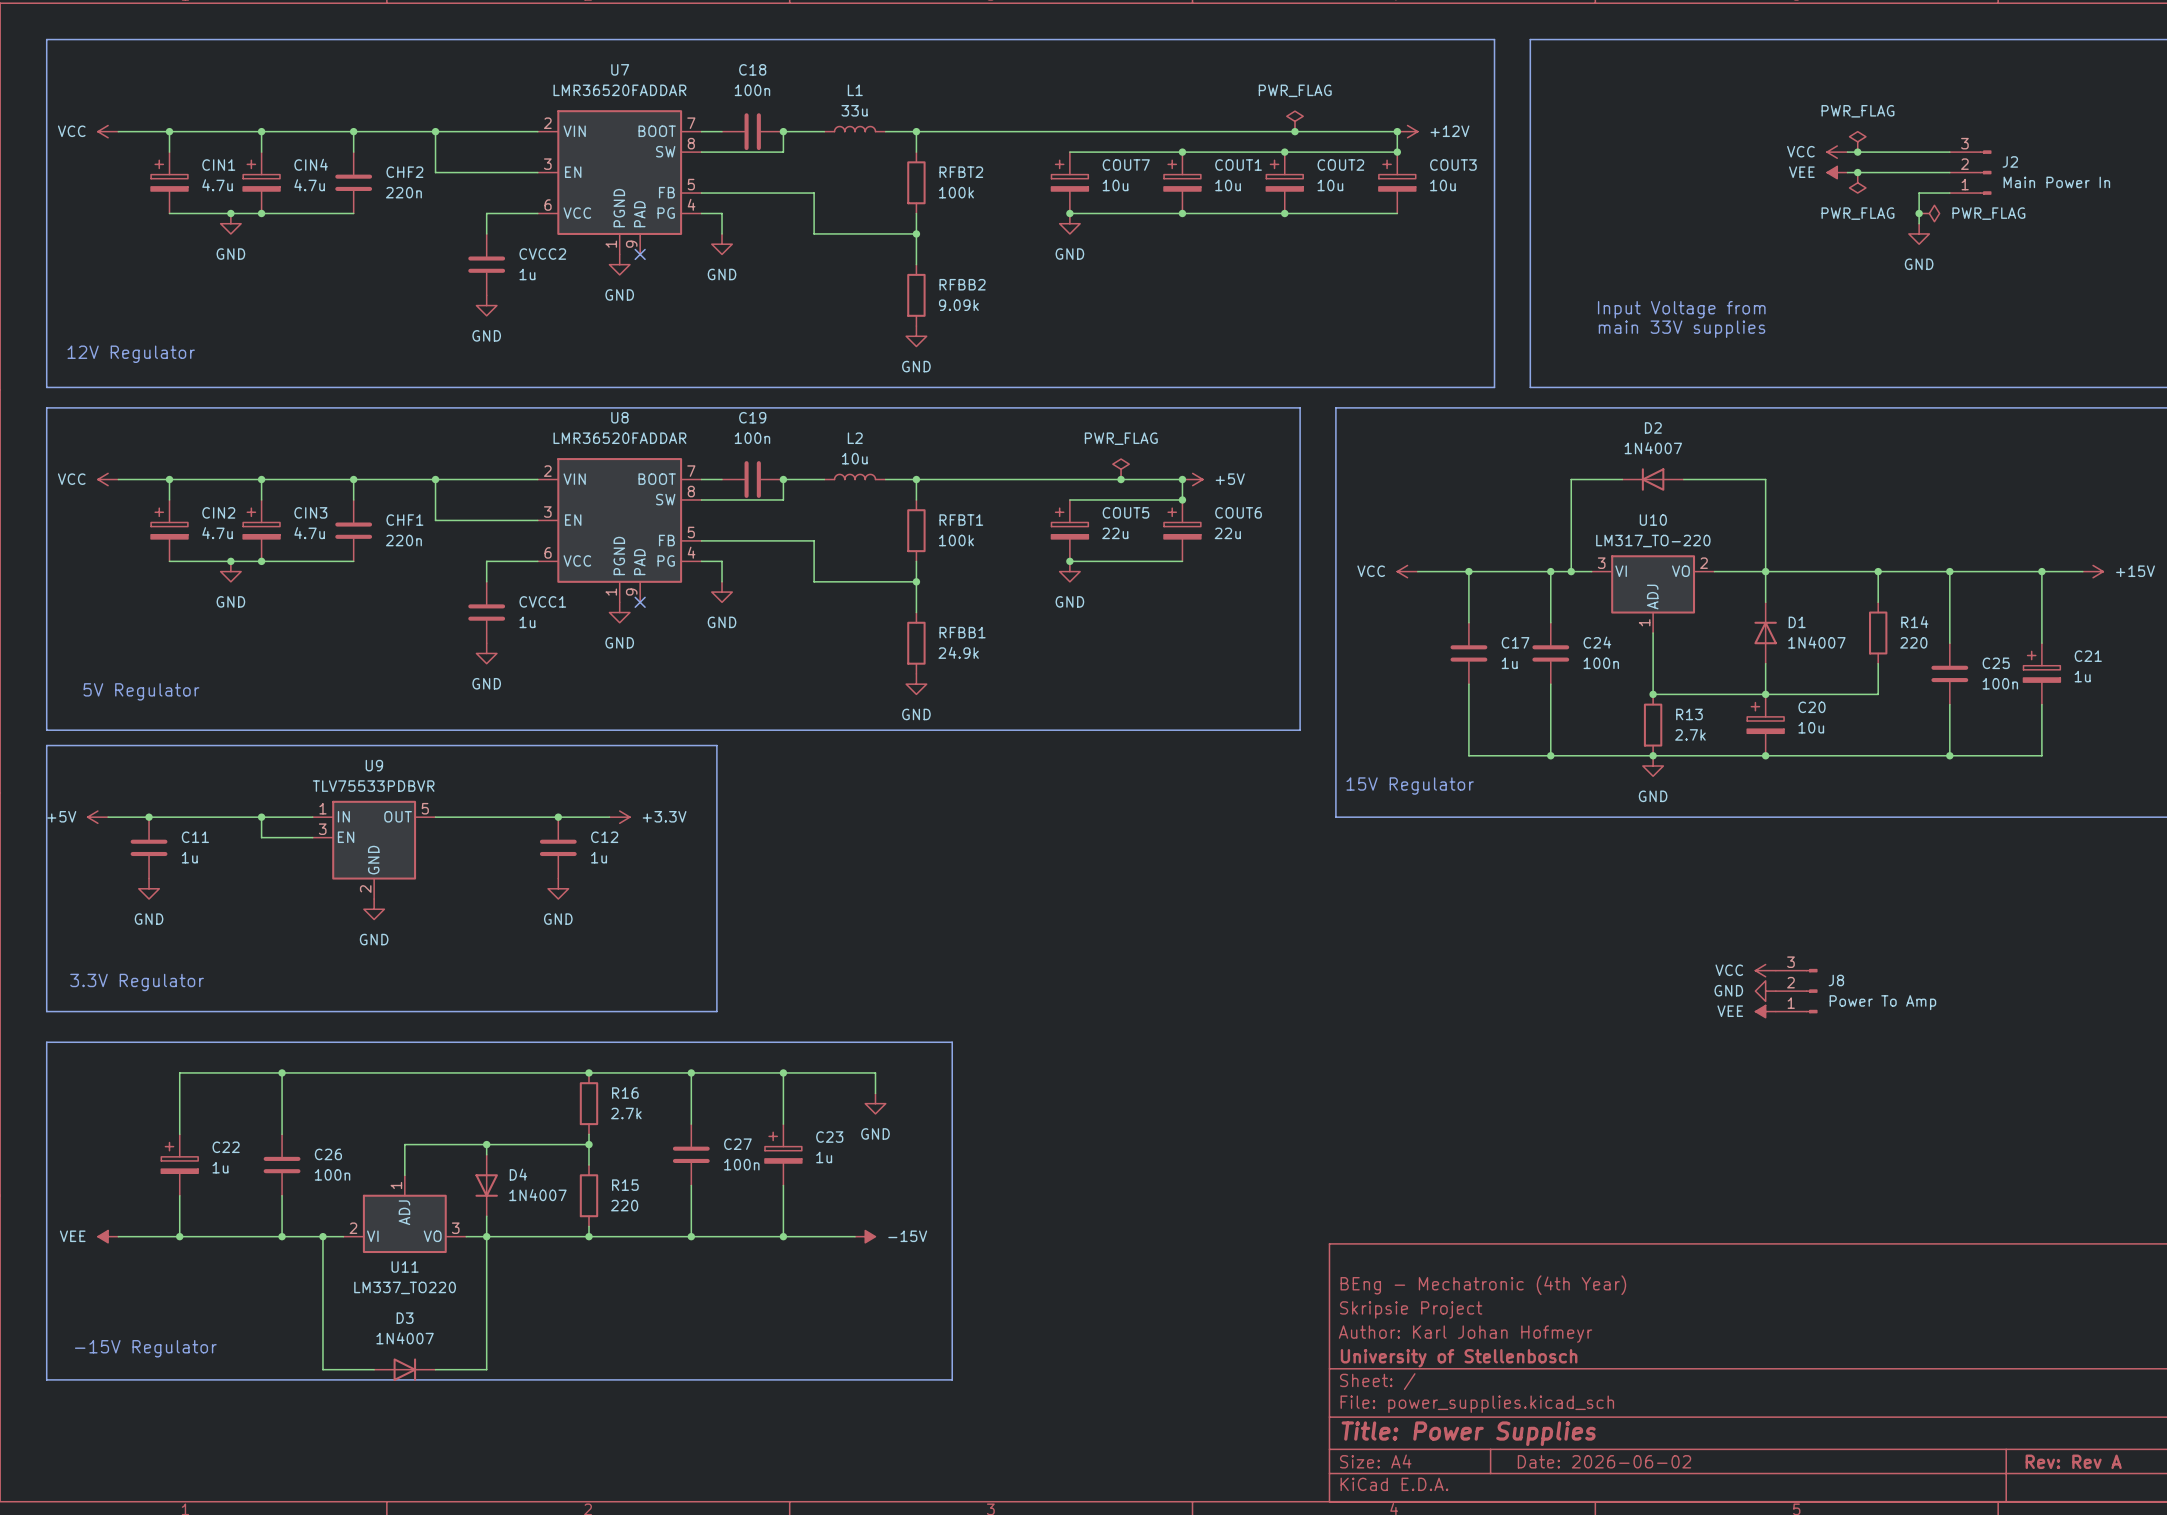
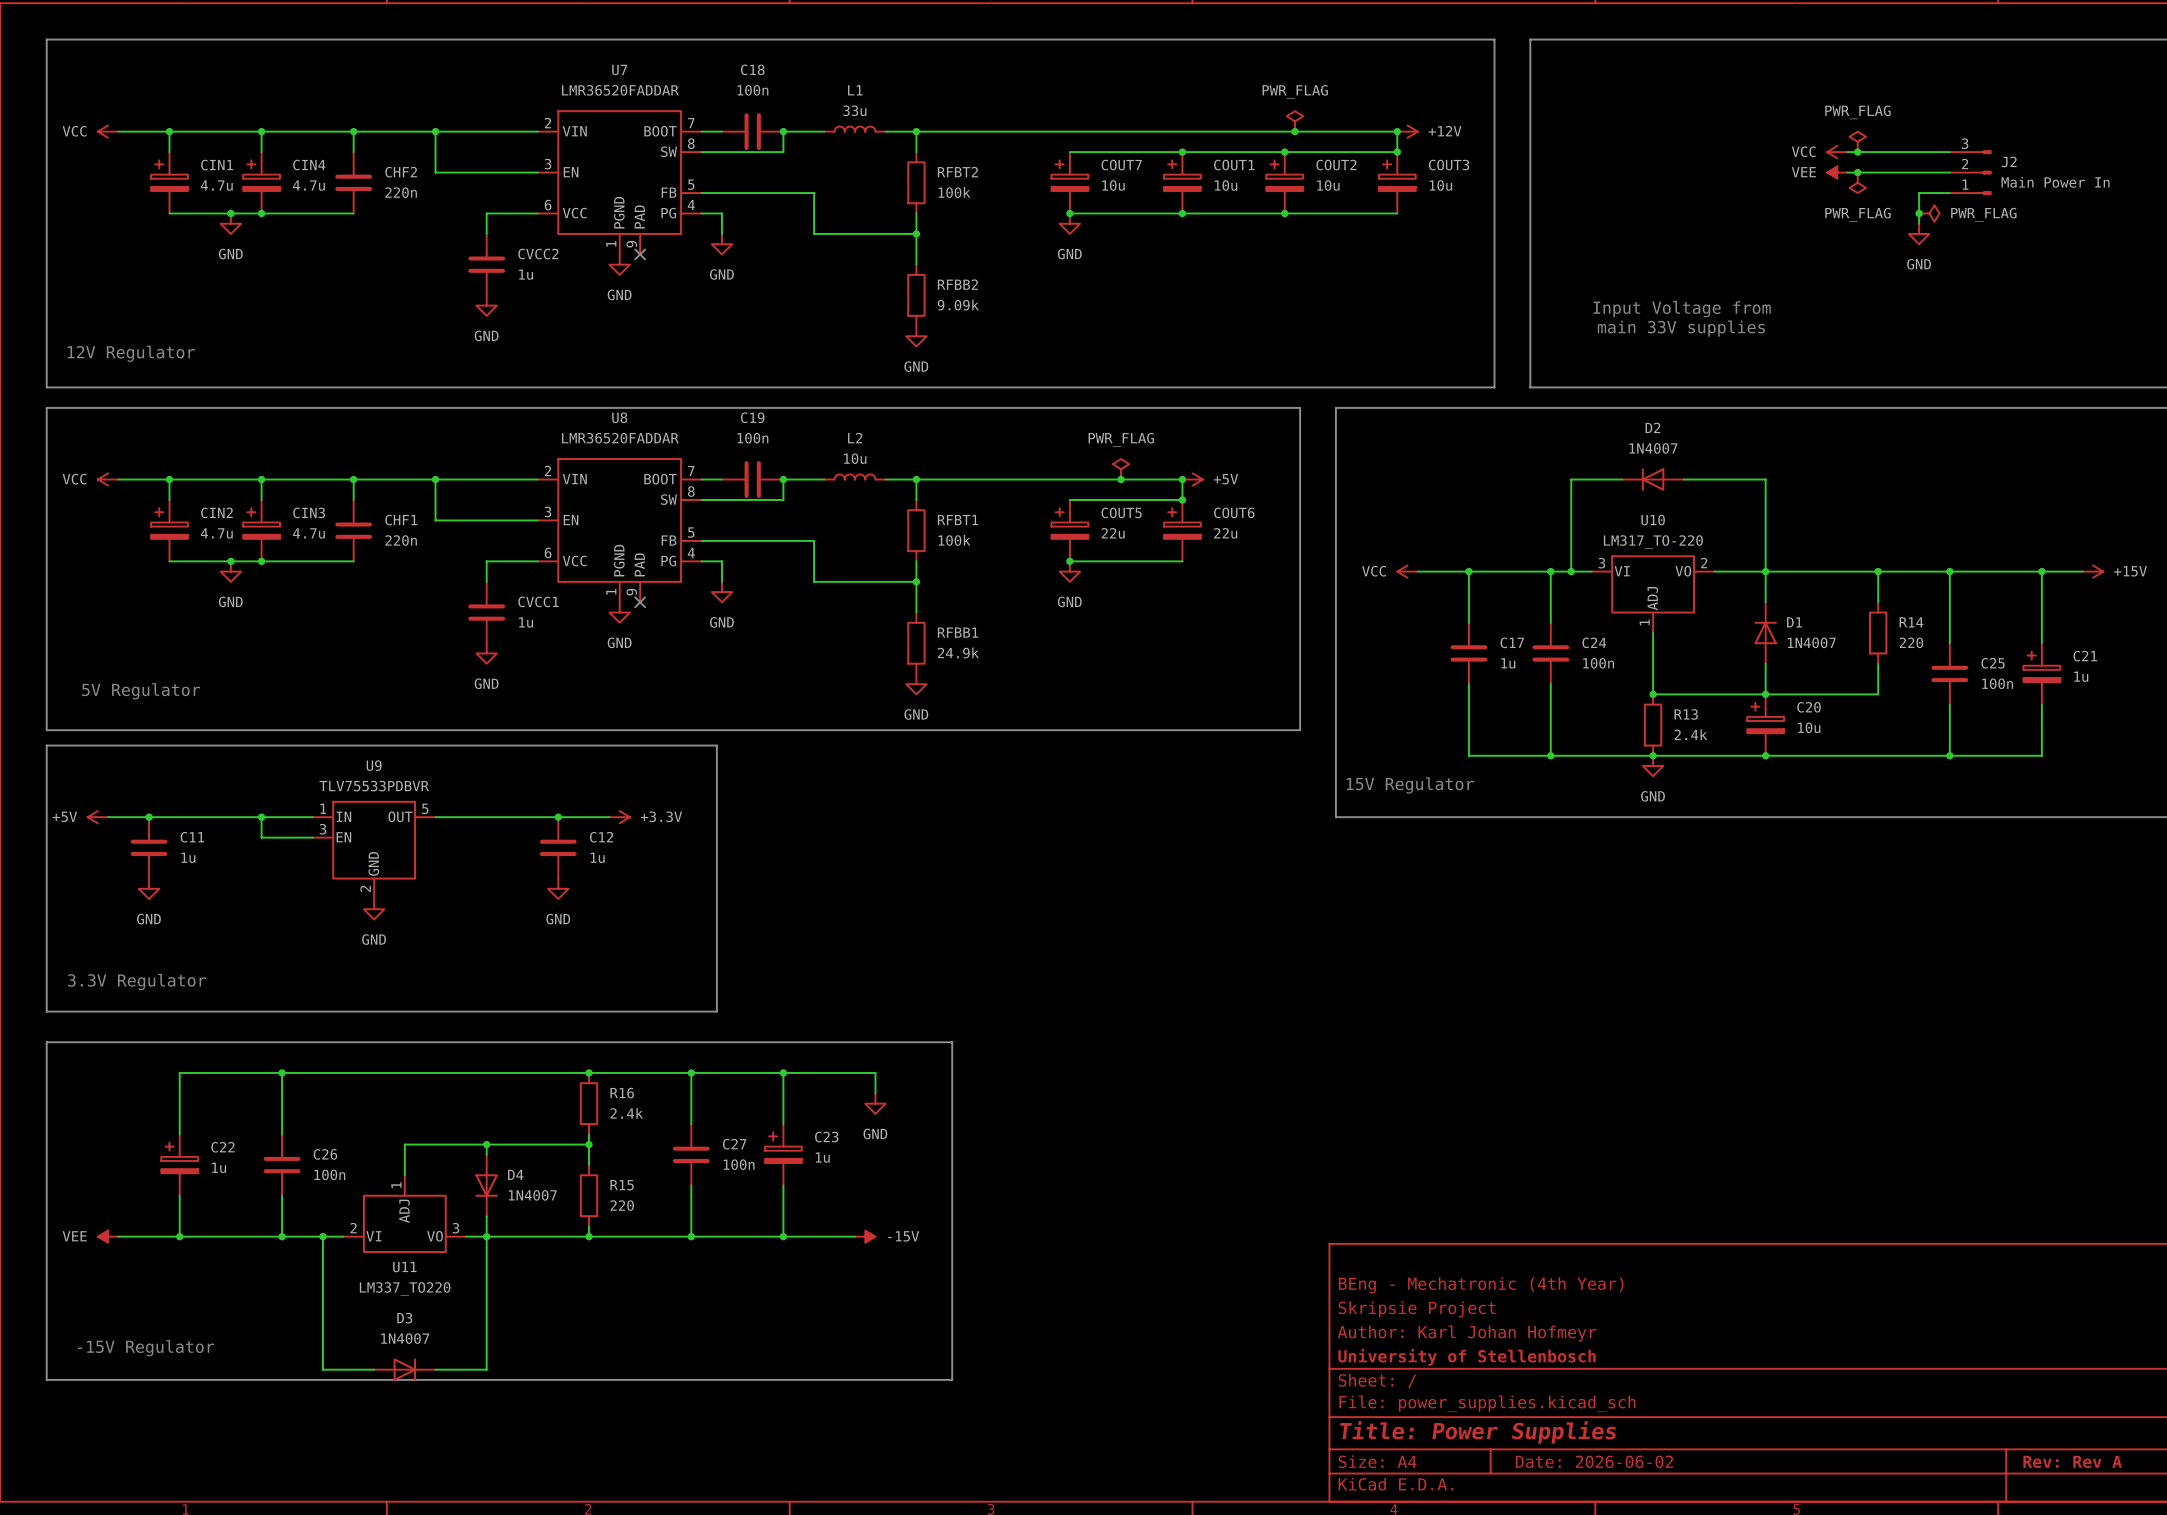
R13 value: 2.7k (1690, 734) -> 2.4k (1690, 734)
power symbol: VCC (1765, 970) -> none
power symbol: GND (1765, 991) -> none
J8: Power To Amp (1796, 991) -> none
power symbol: VEE (1765, 1011) -> none
R16 value: 2.7k (626, 1113) -> 2.4k (626, 1113)

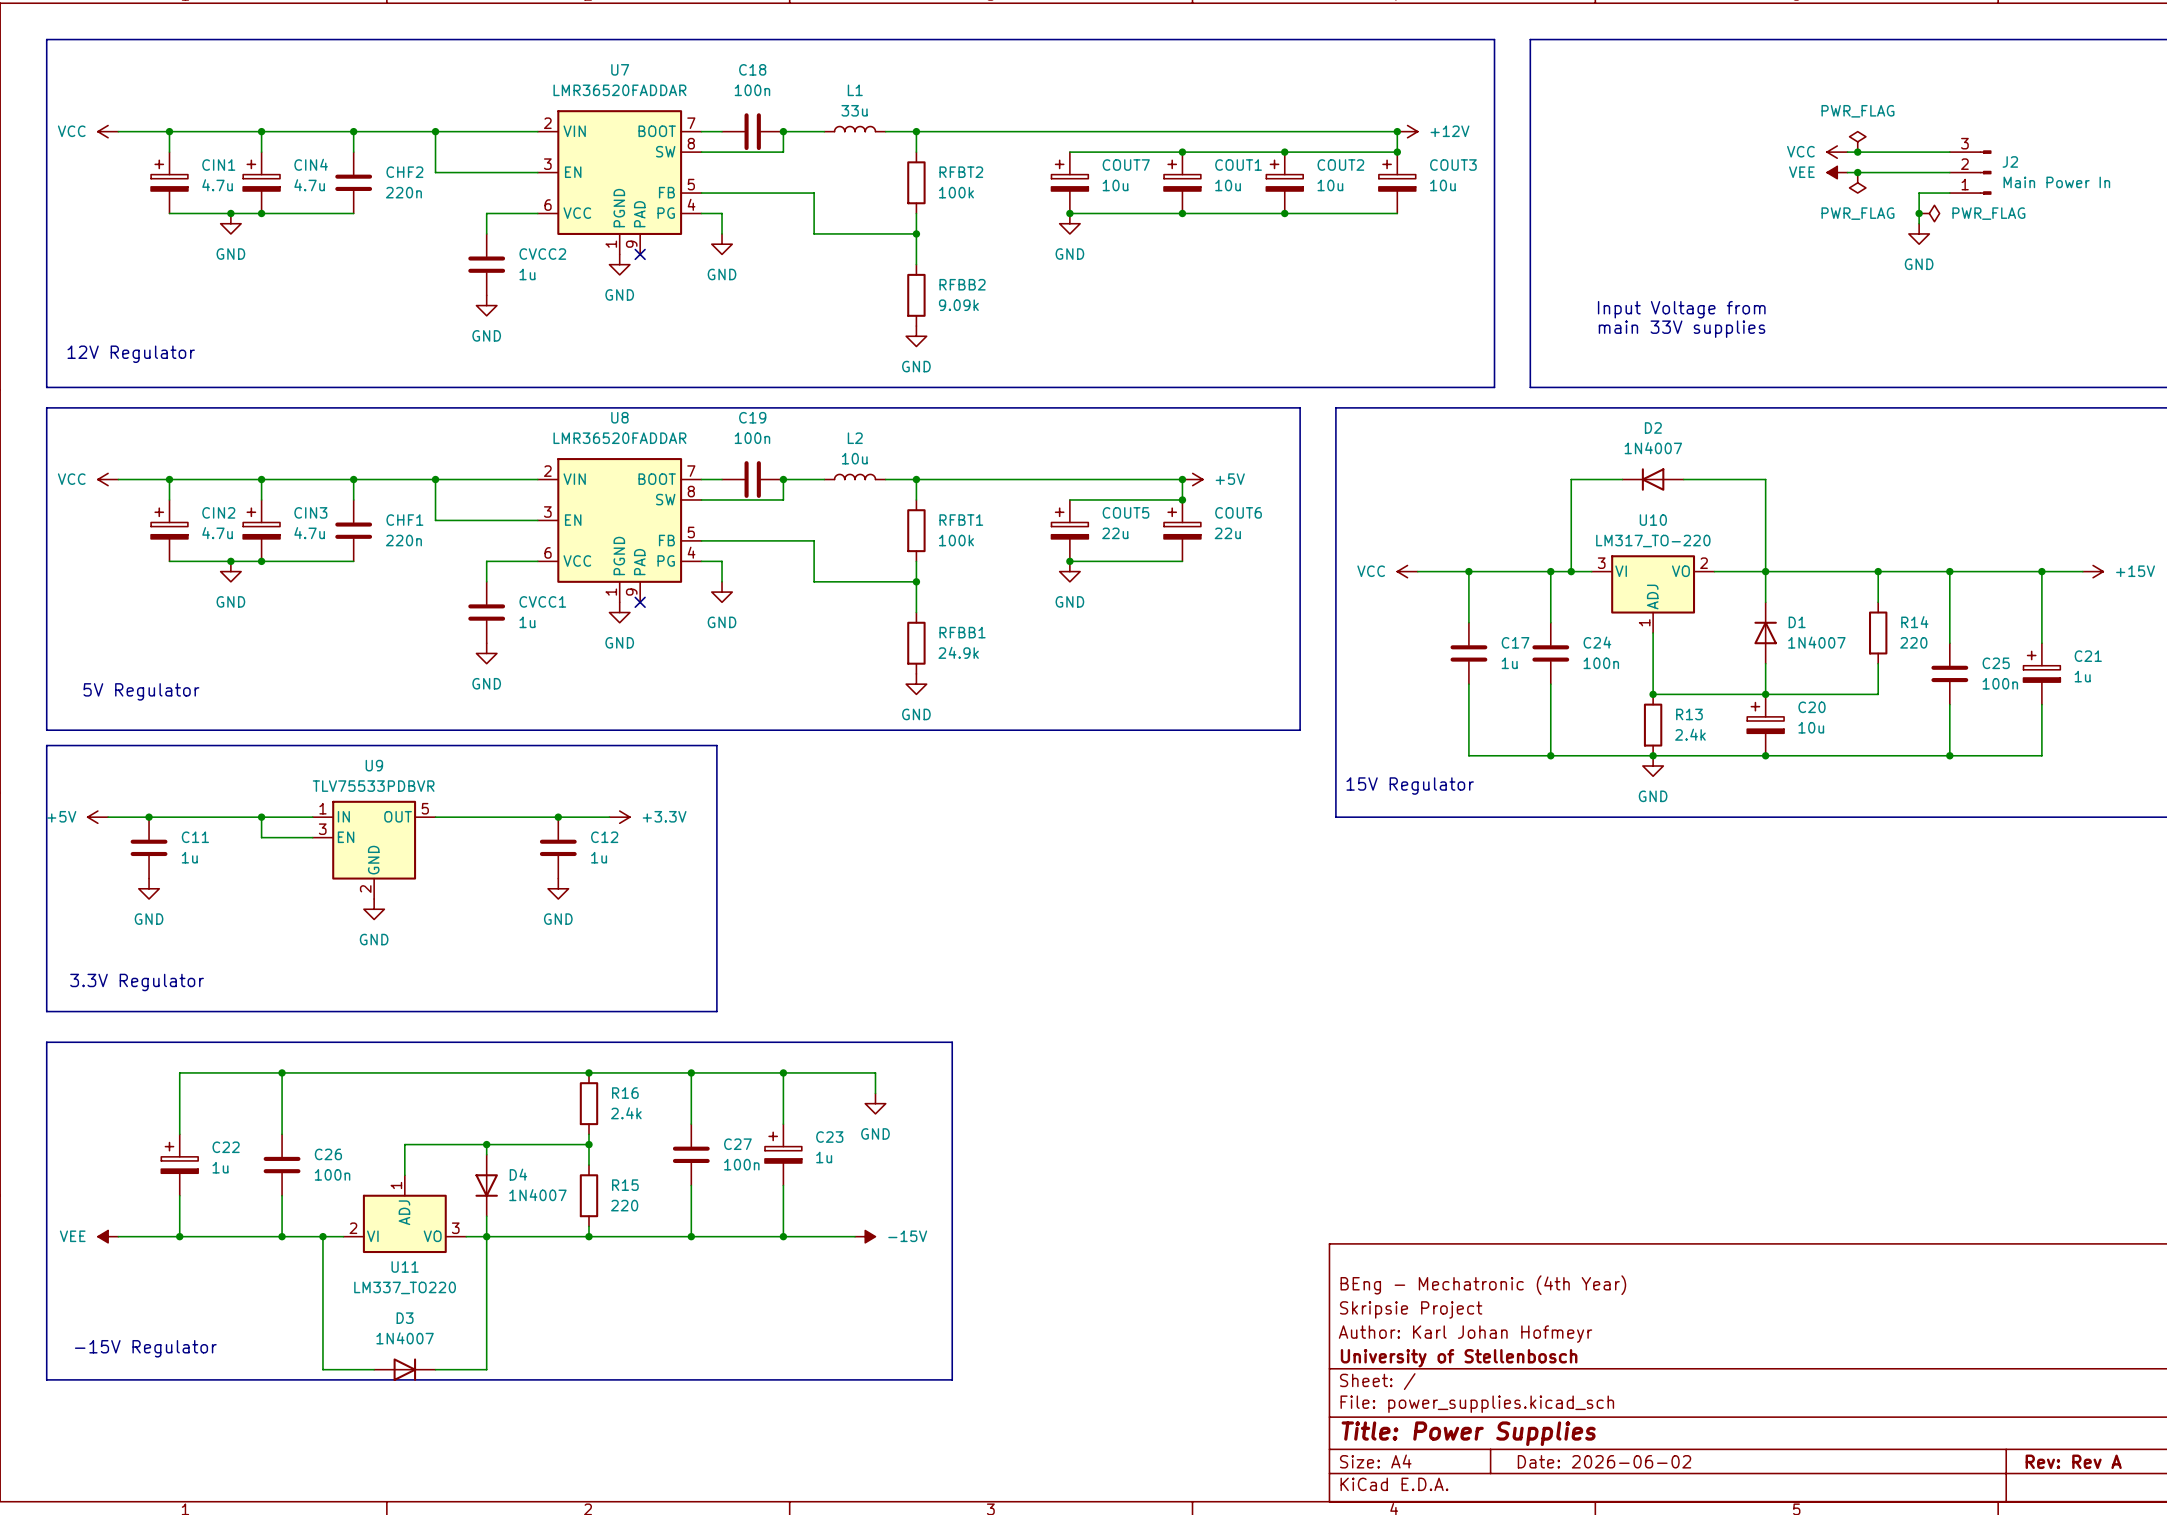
power symbol: PWR_FLAG (1294, 121) -> none
junction: (1294, 131) -> none
power symbol: PWR_FLAG (1121, 469) -> none
junction: (1121, 479) -> none

